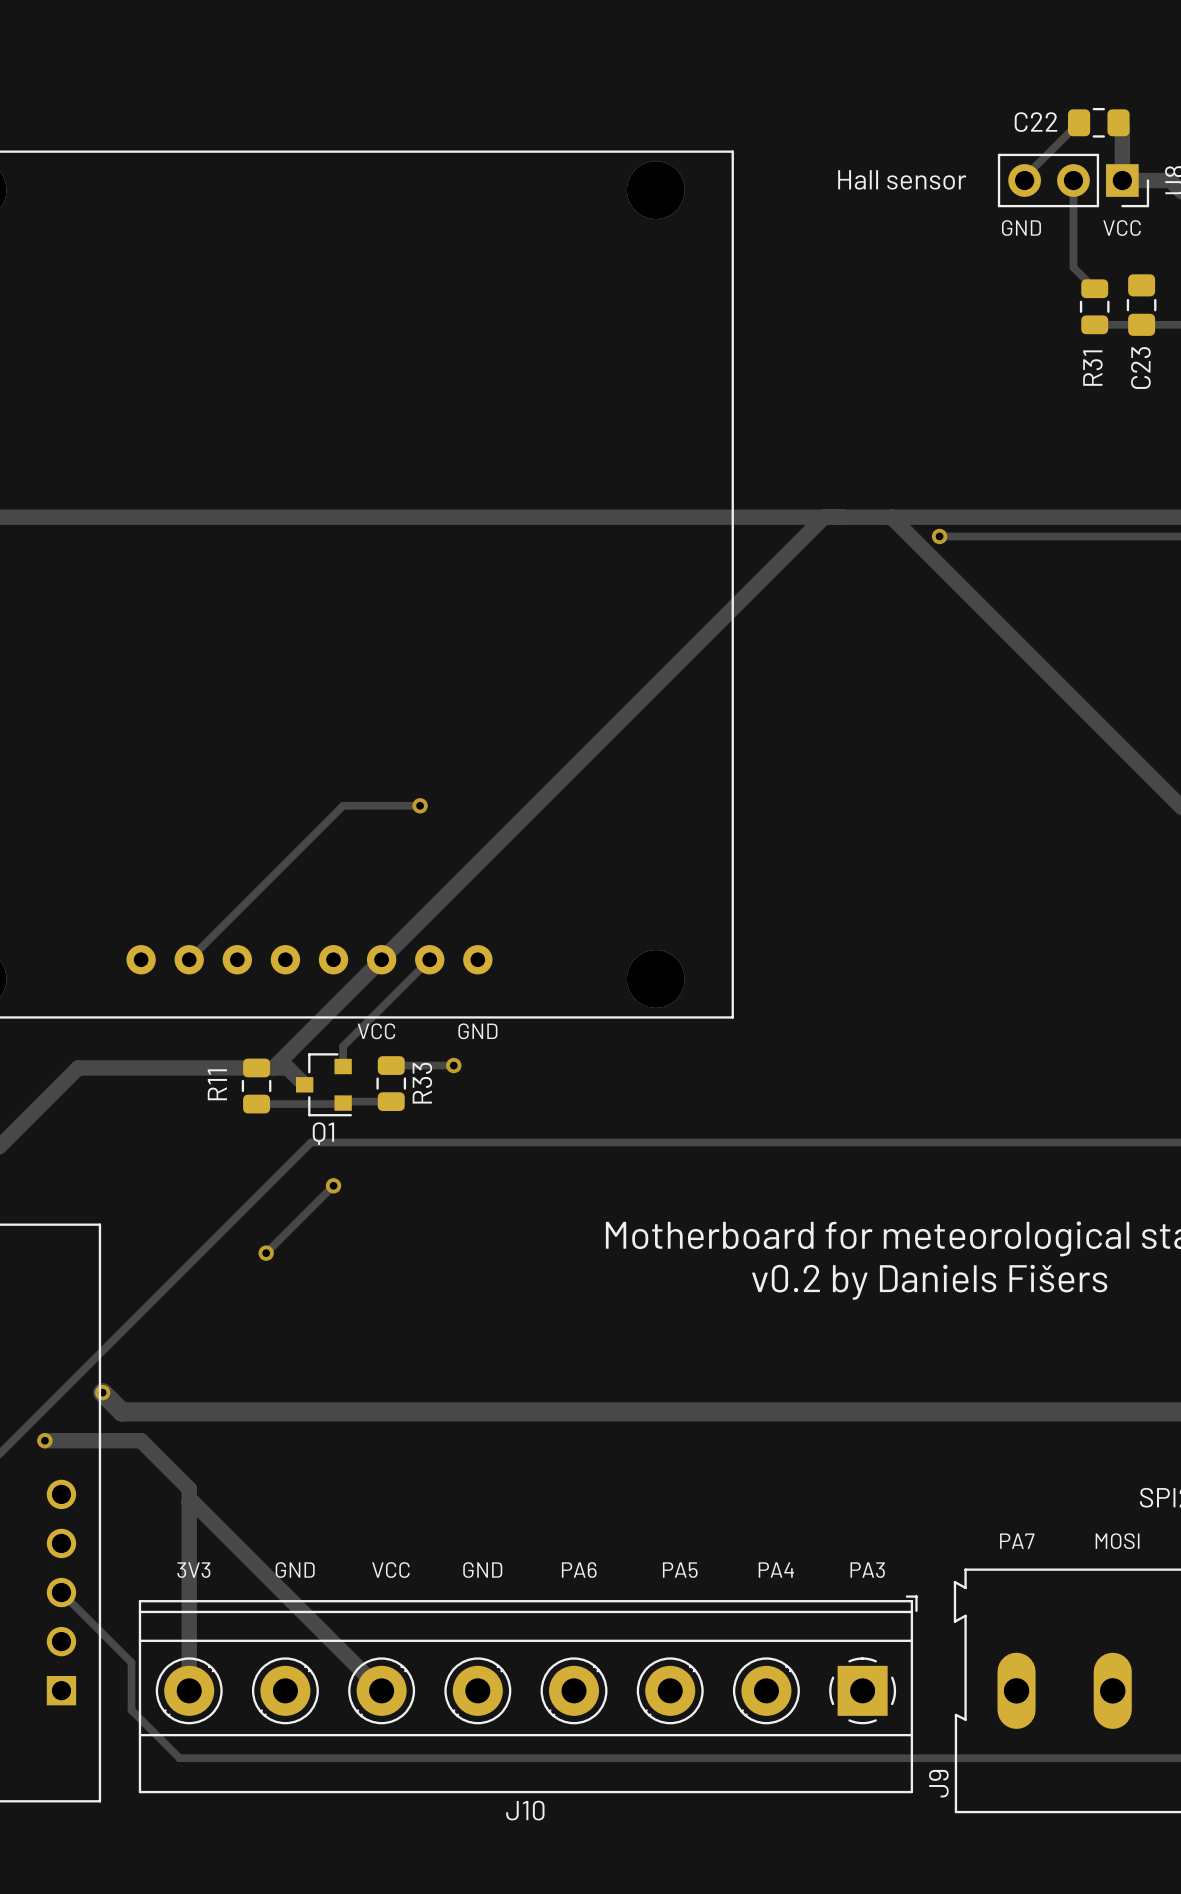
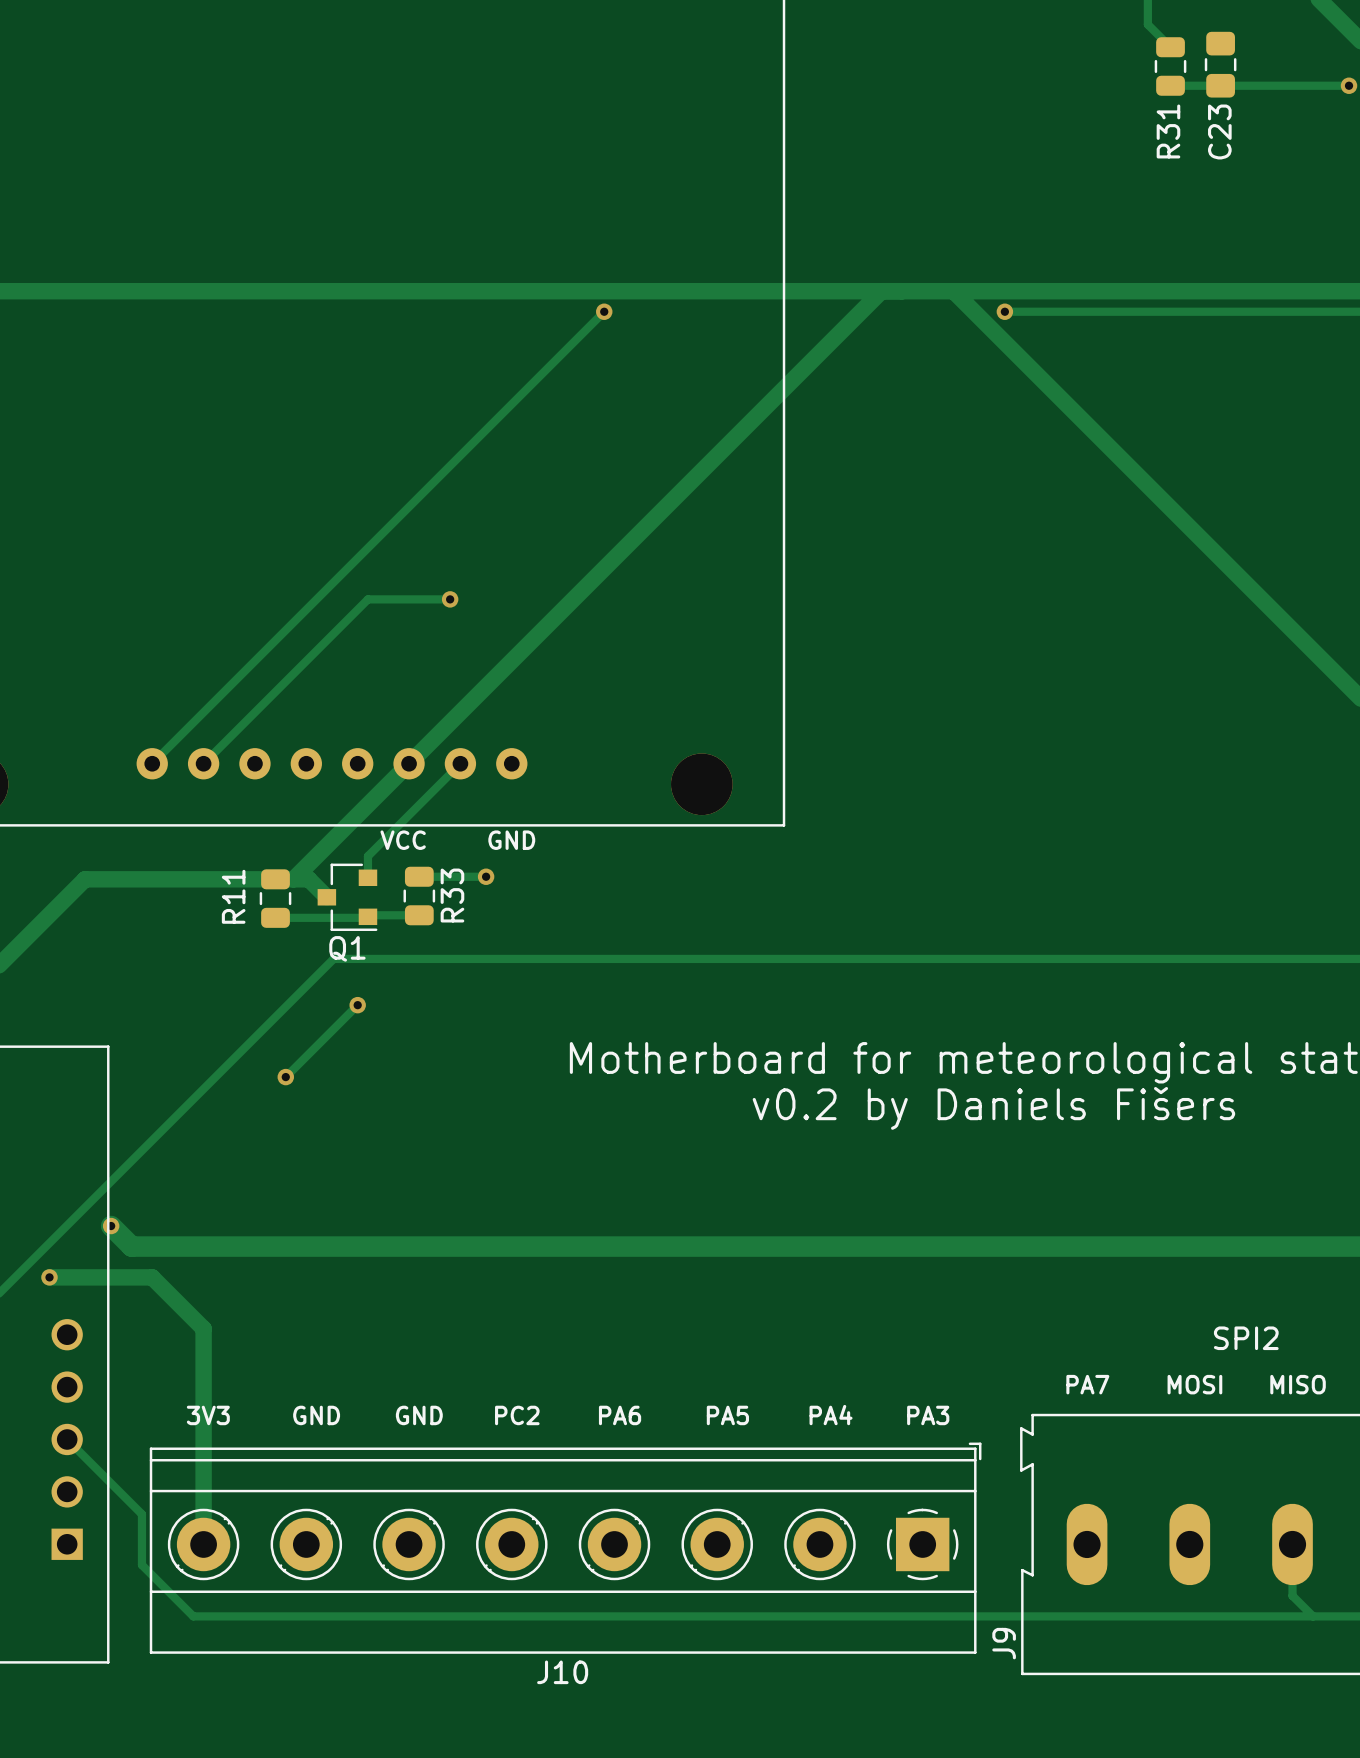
track: none -> (604, 311) (152, 763)
via: none -> (604, 311)
track: (189, 1502) (193, 1502) (381, 1690) -> none
text: VCC (390, 1570) -> GND (419, 1415)
text: GND (482, 1570) -> PC2 (517, 1415)

